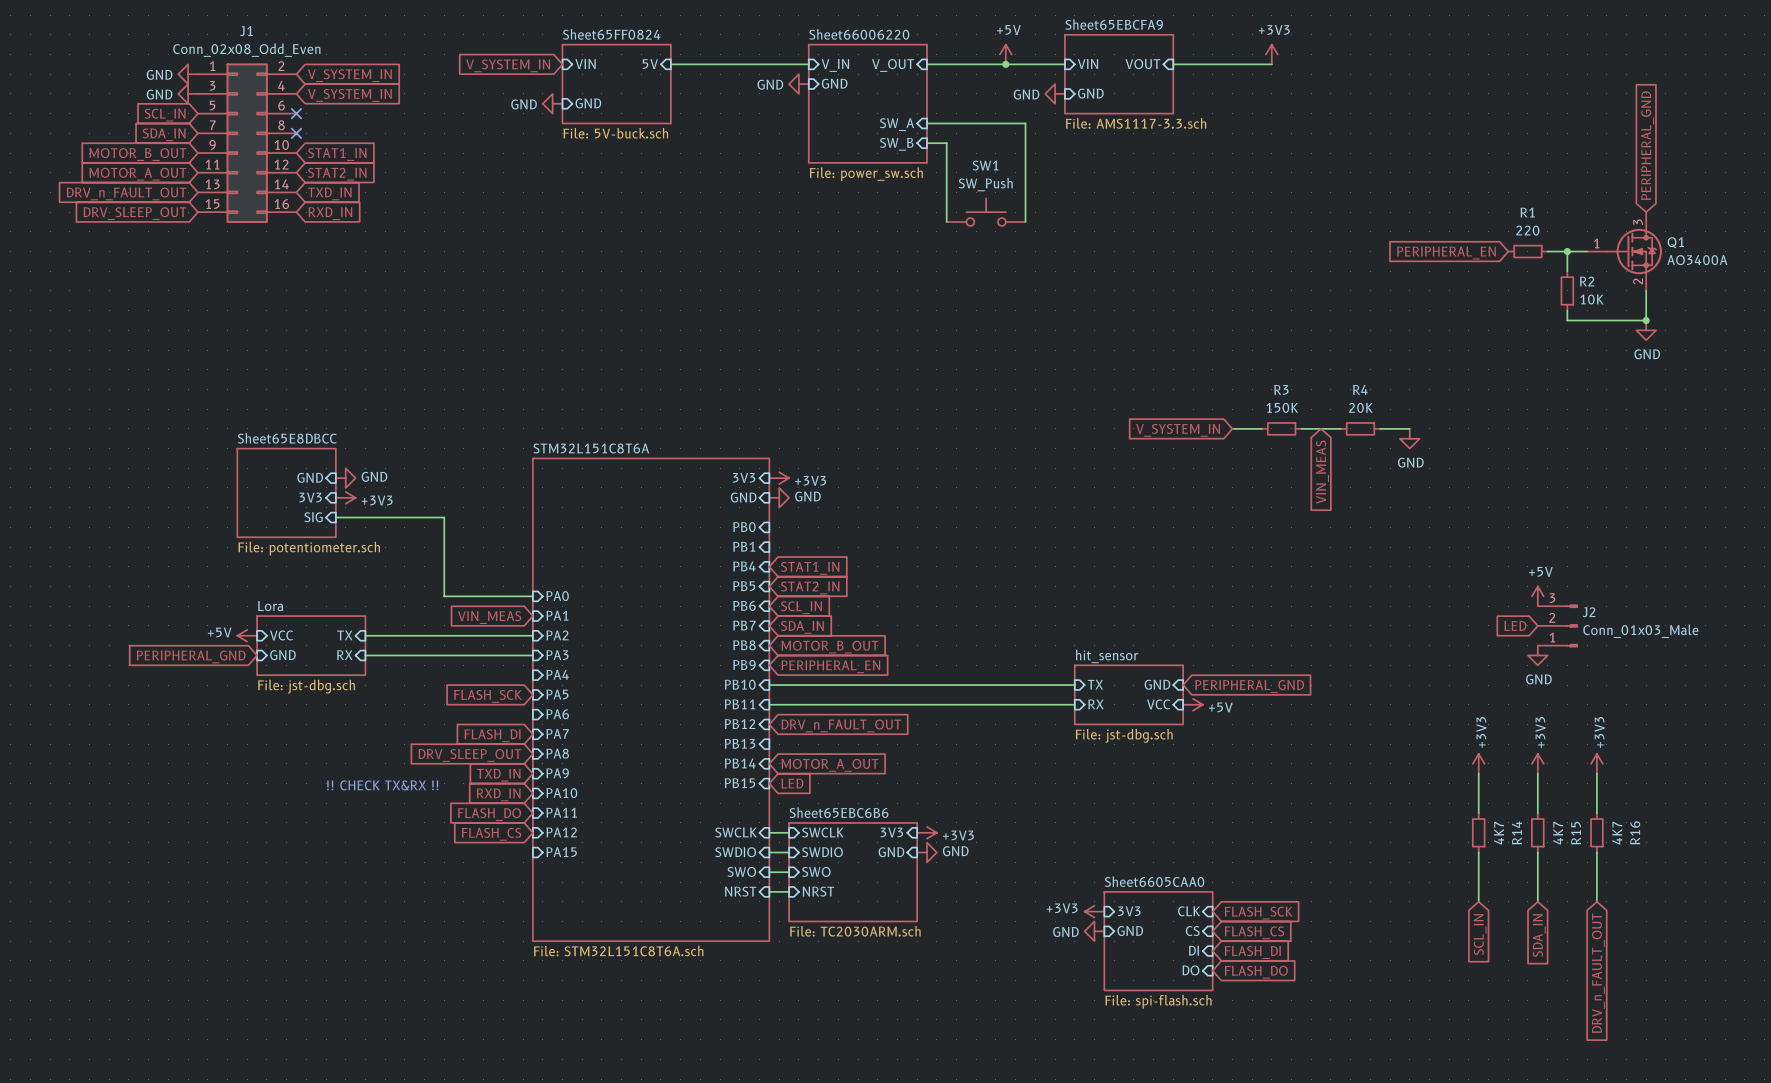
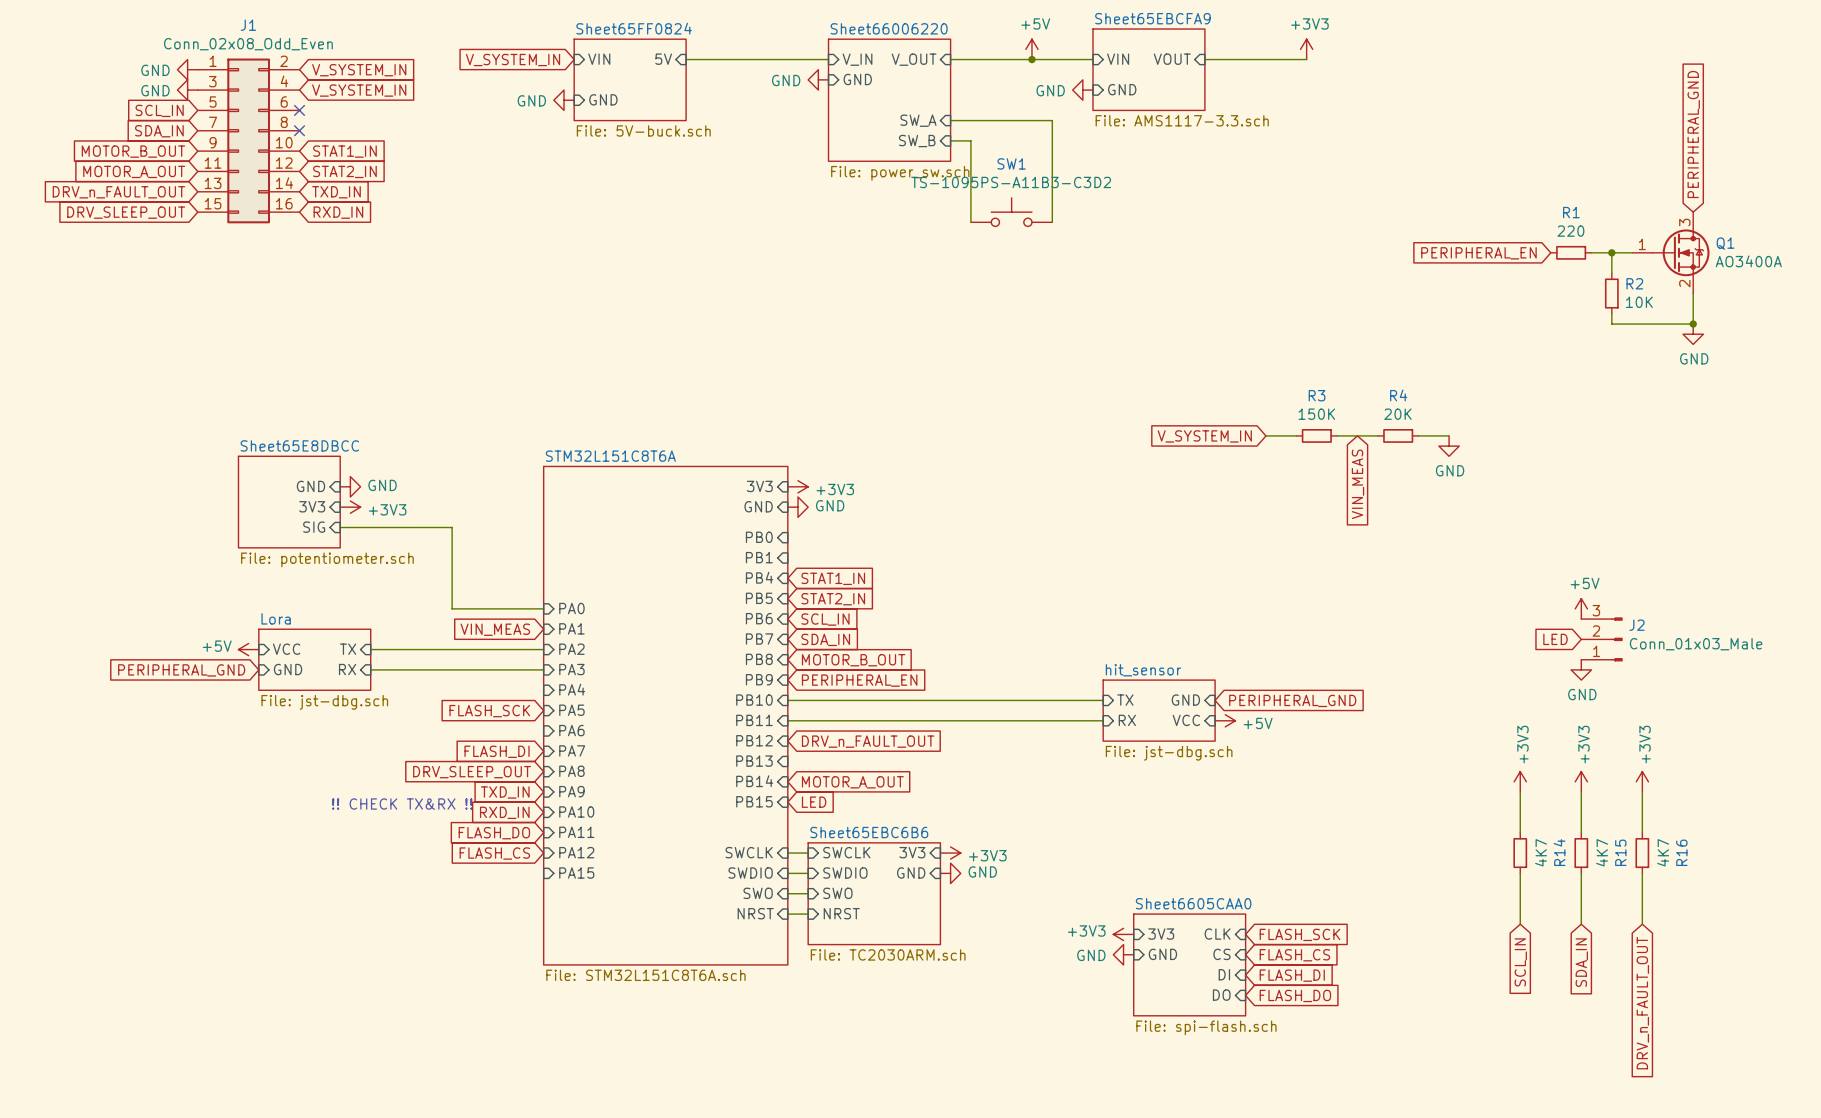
SW1 value: SW_Push (985, 184) -> TS-1095PS-A11B3-C3D2 (1011, 182)

